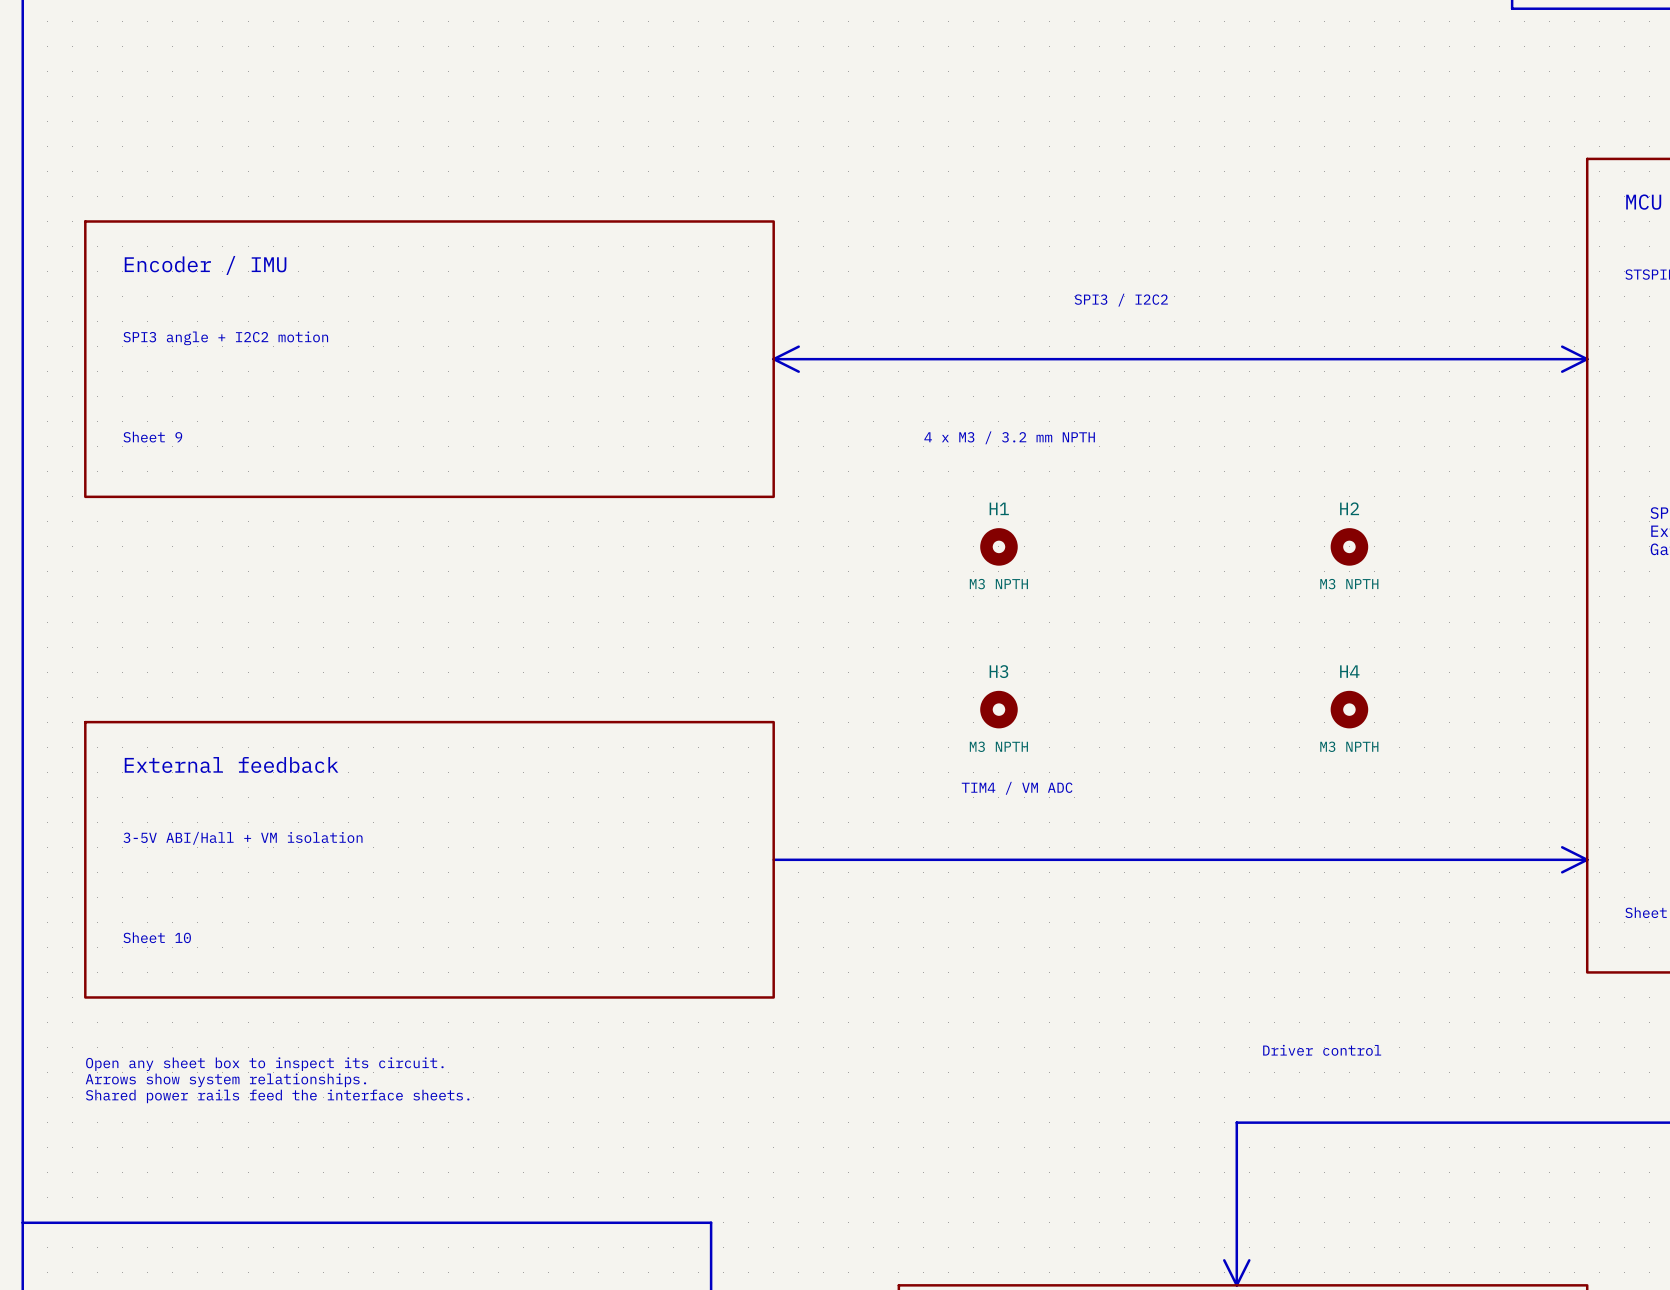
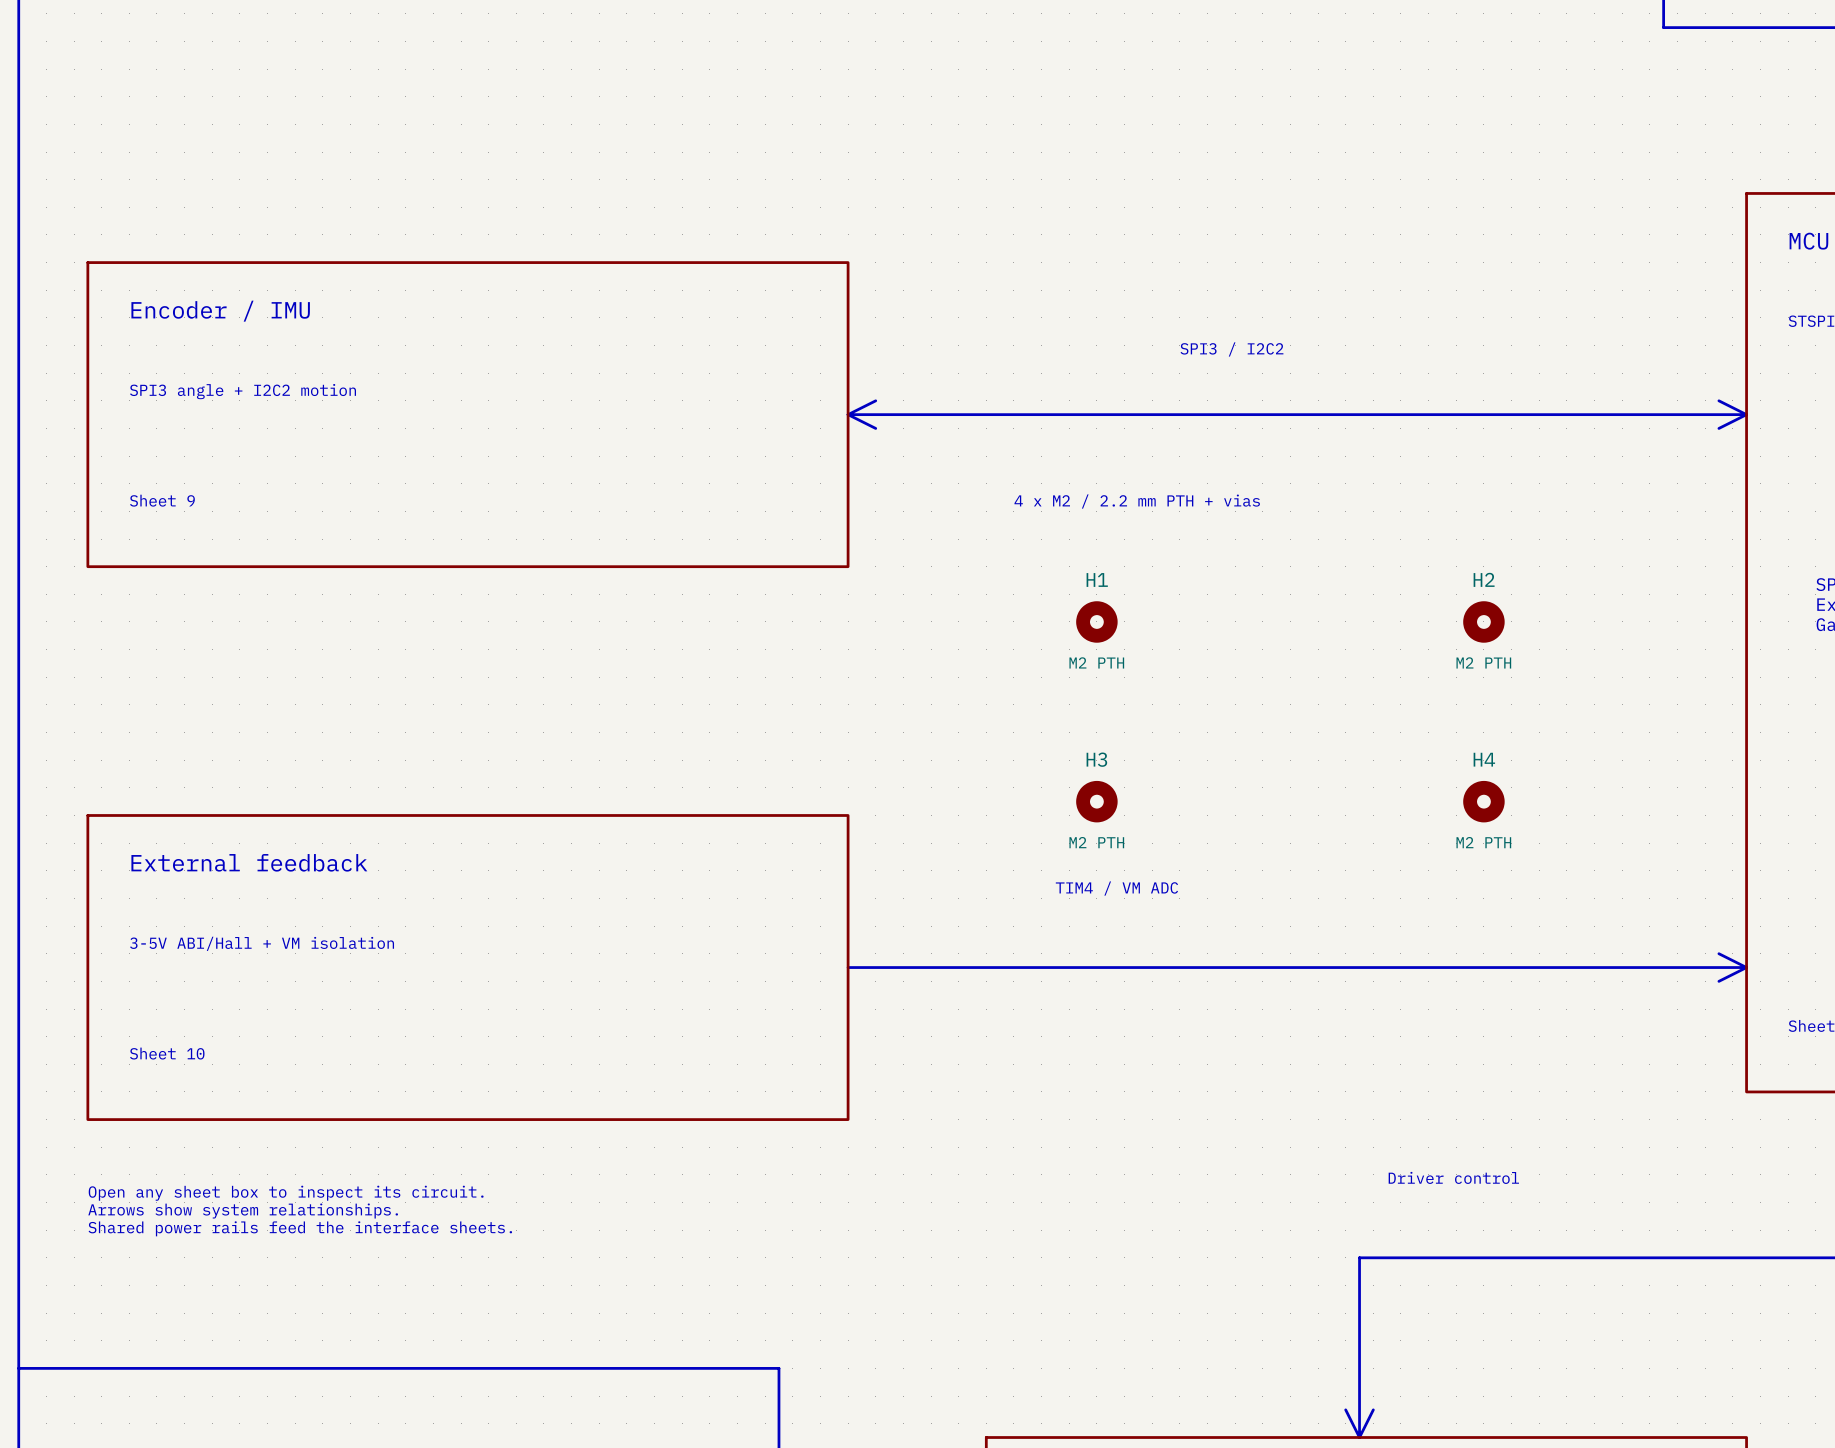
text: 4 x M3 / 3.2 mm NPTH (1009, 437) -> 4 x M2 / 2.2 mm PTH + vias (1137, 501)
H1 value: M3 NPTH (998, 584) -> M2 PTH (1096, 662)
H2 value: M3 NPTH (1349, 584) -> M2 PTH (1483, 662)
H3 value: M3 NPTH (998, 746) -> M2 PTH (1096, 842)
H4 value: M3 NPTH (1349, 746) -> M2 PTH (1483, 842)

